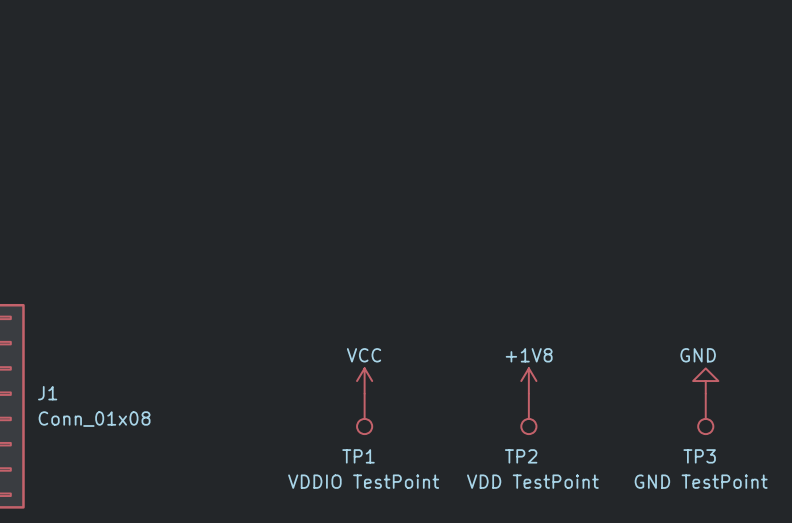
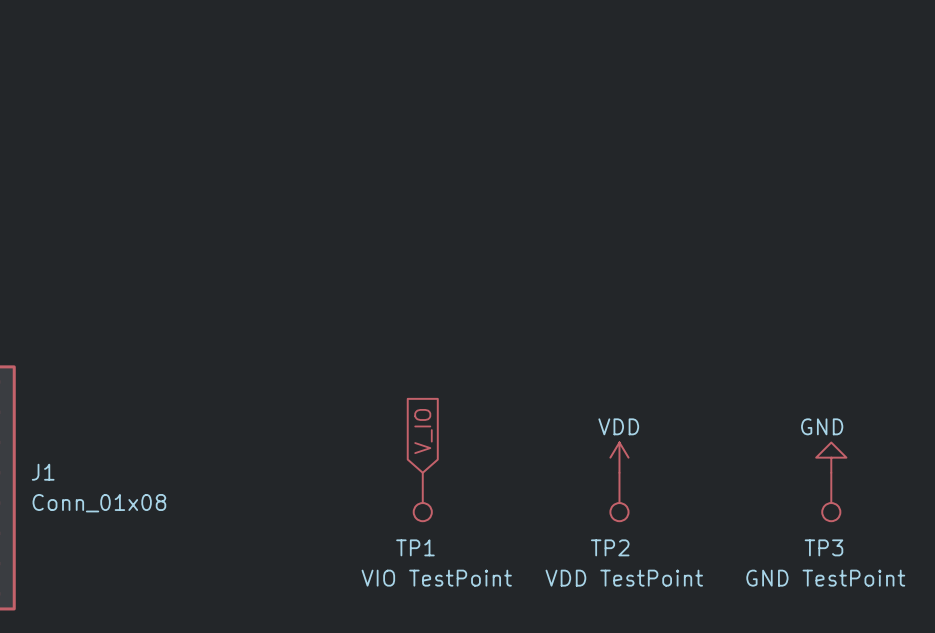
global label: none -> V_IO (423, 431)
power symbol: VCC (364, 381) -> none
power symbol: +1V8 (528, 381) -> VDD (619, 457)
TP1 value: VDDIO TestPoint (363, 481) -> VIO TestPoint (436, 578)

